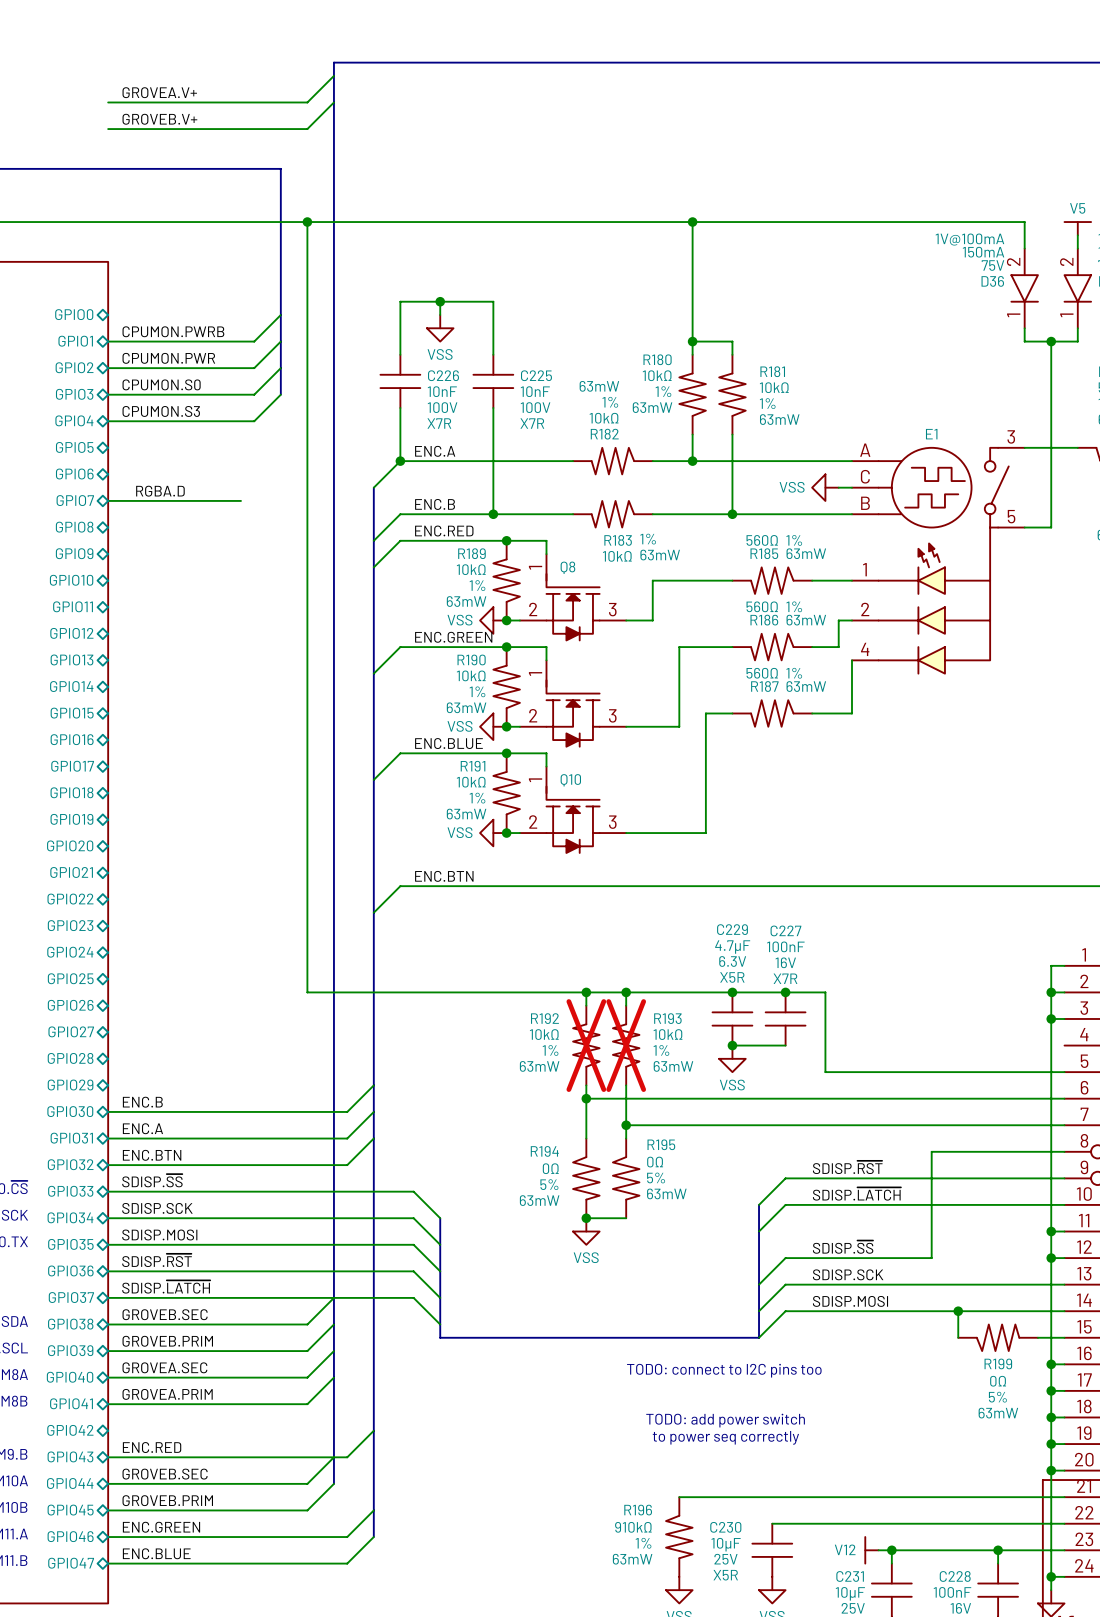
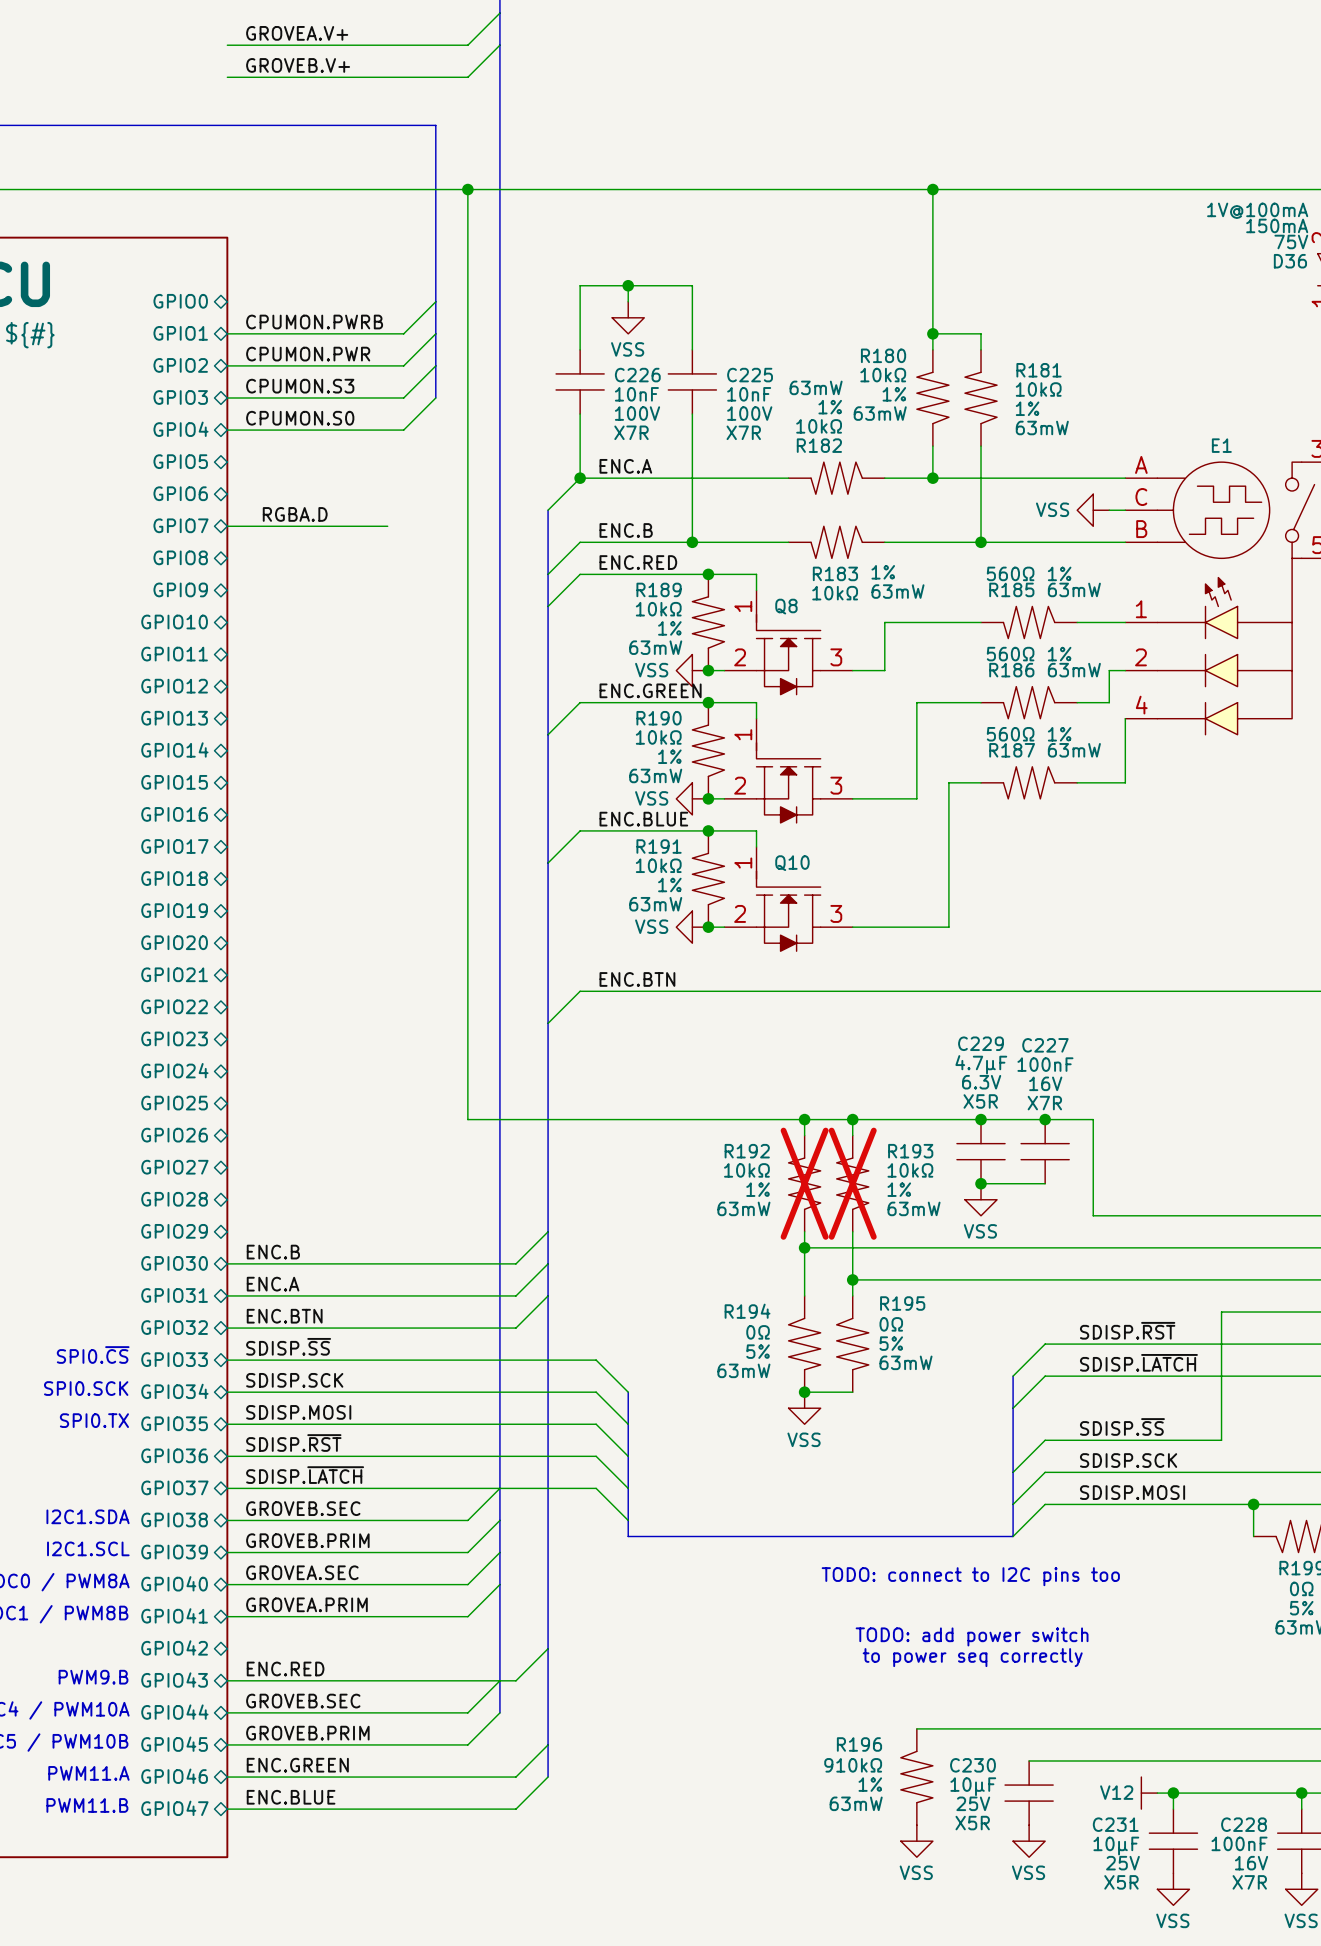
label: CPUMON.S0 (161, 384) -> CPUMON.S3 (300, 386)
label: CPUMON.S3 (161, 411) -> CPUMON.S0 (300, 418)

